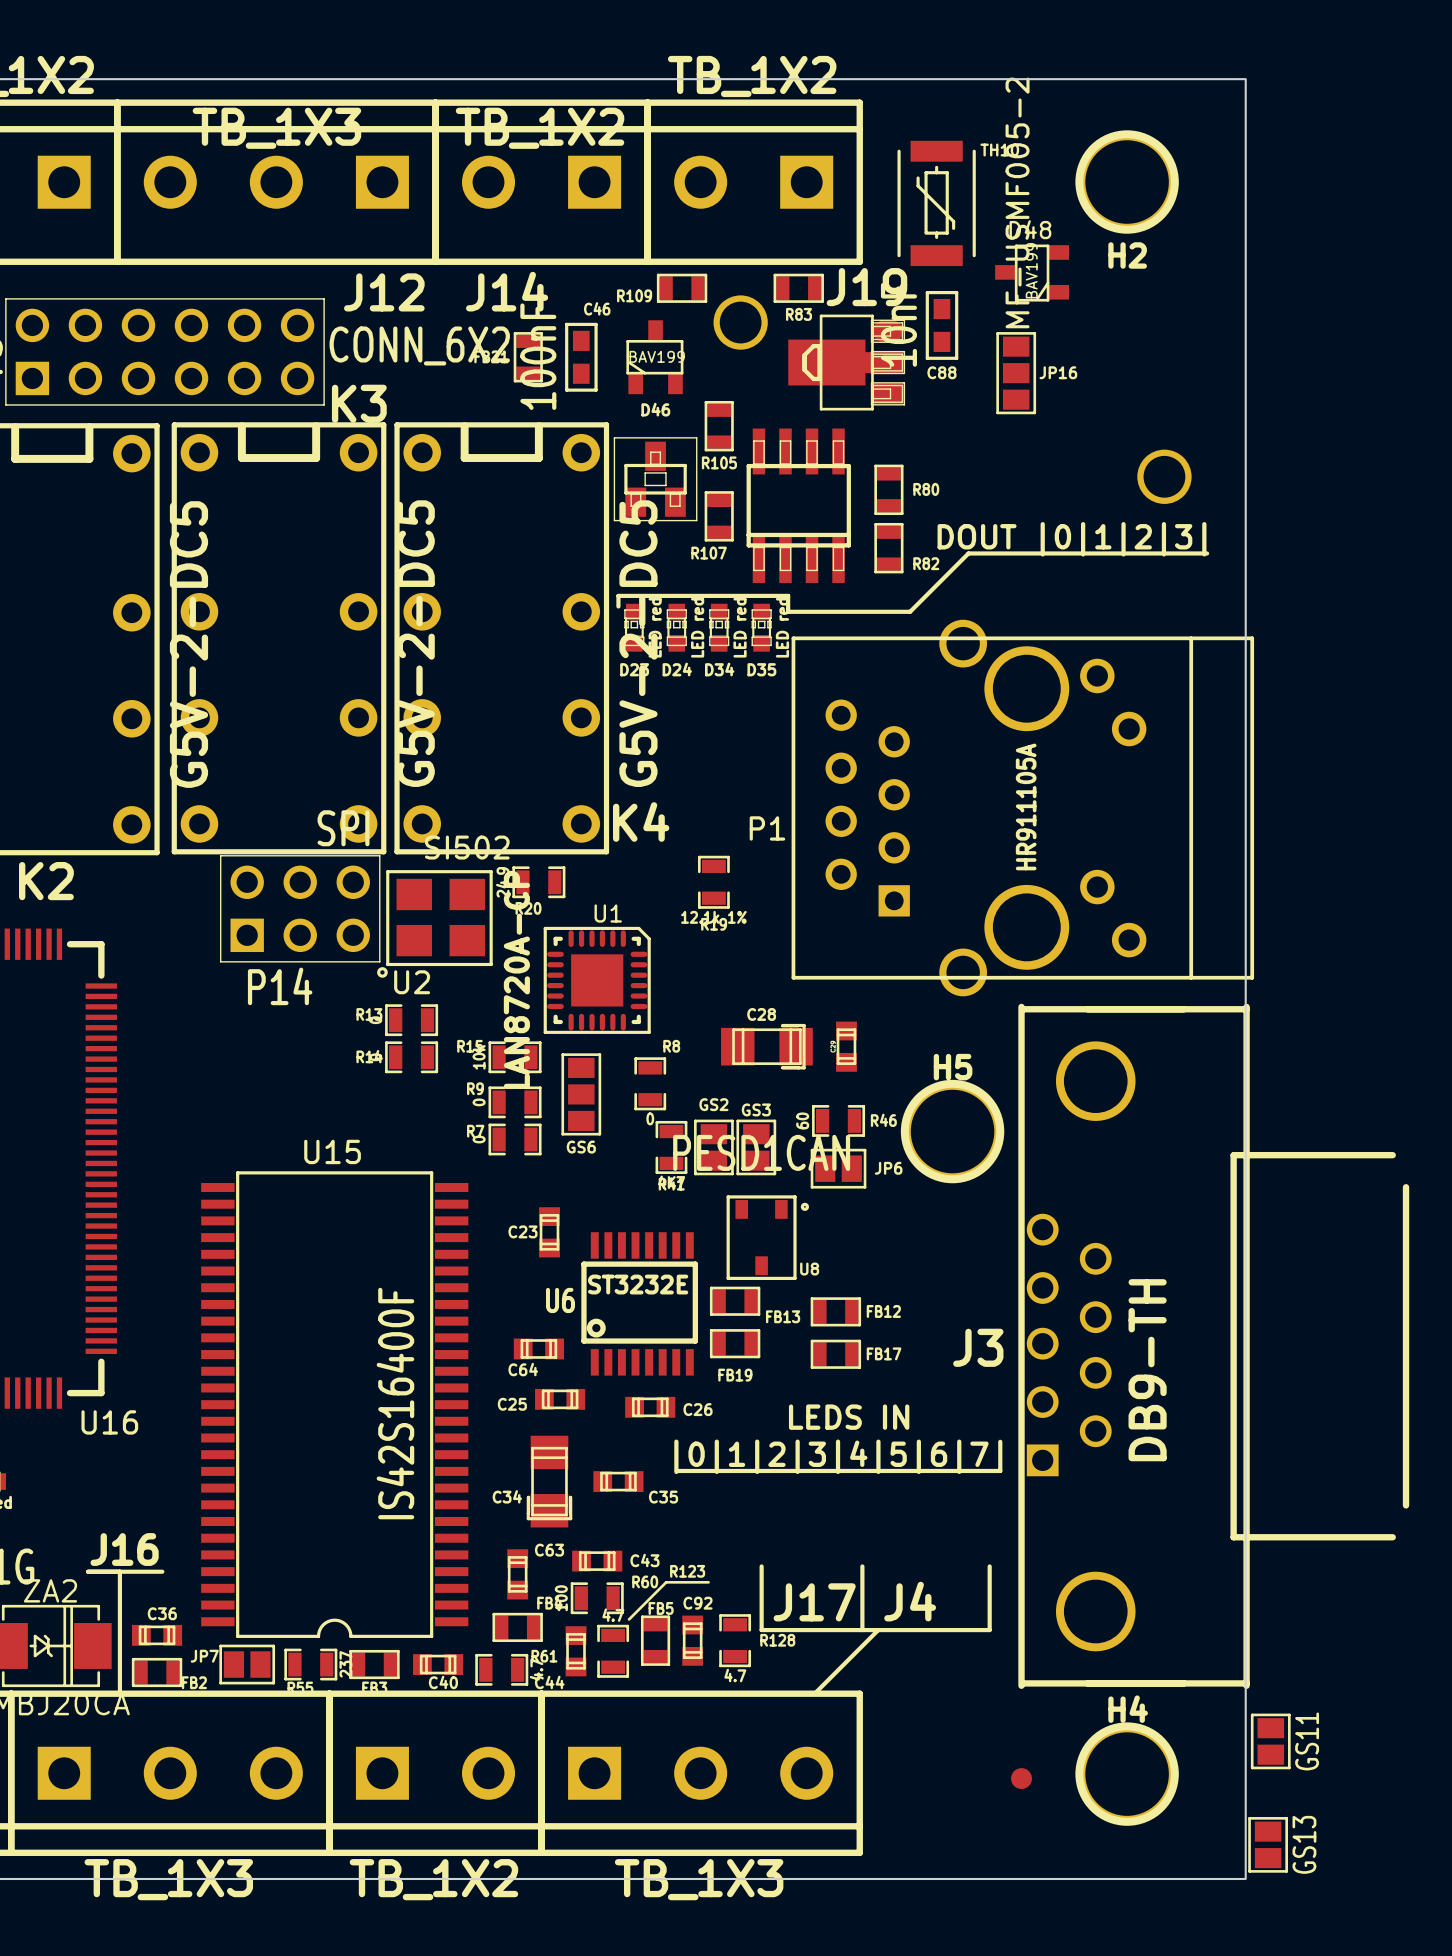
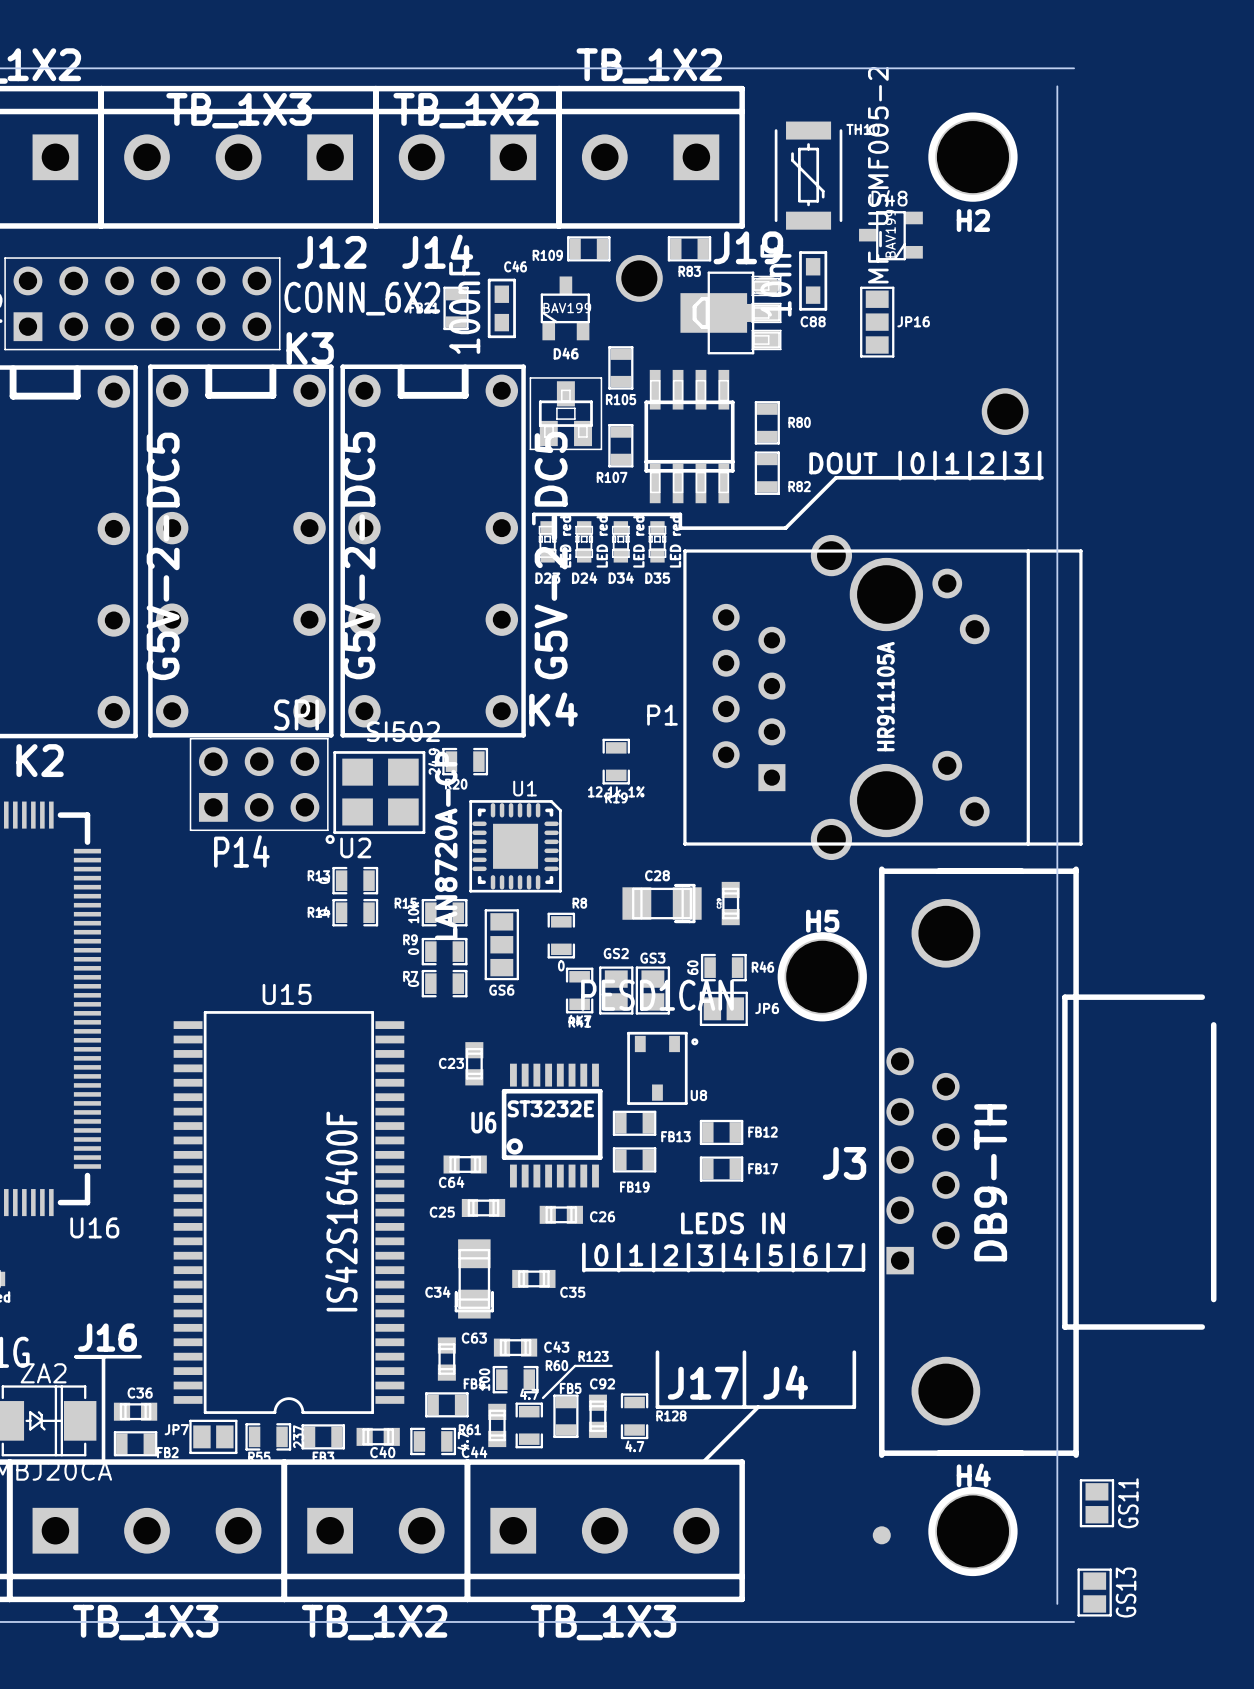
board edge: (1245, 79) (1245, 1878) -> none
board edge: none -> (1057, 86) (1057, 1603)

